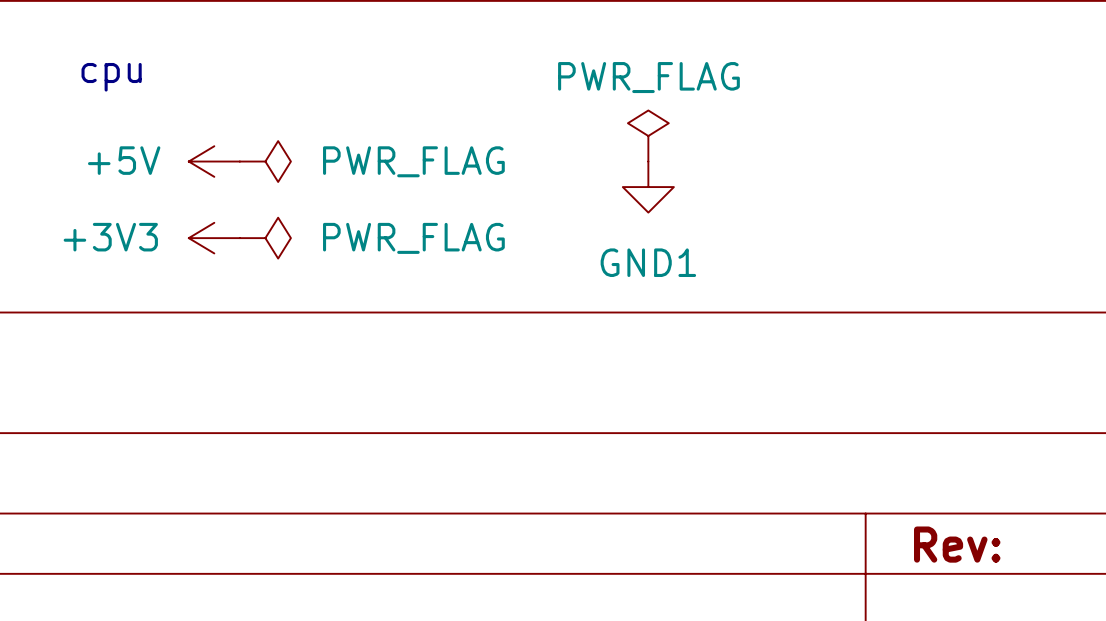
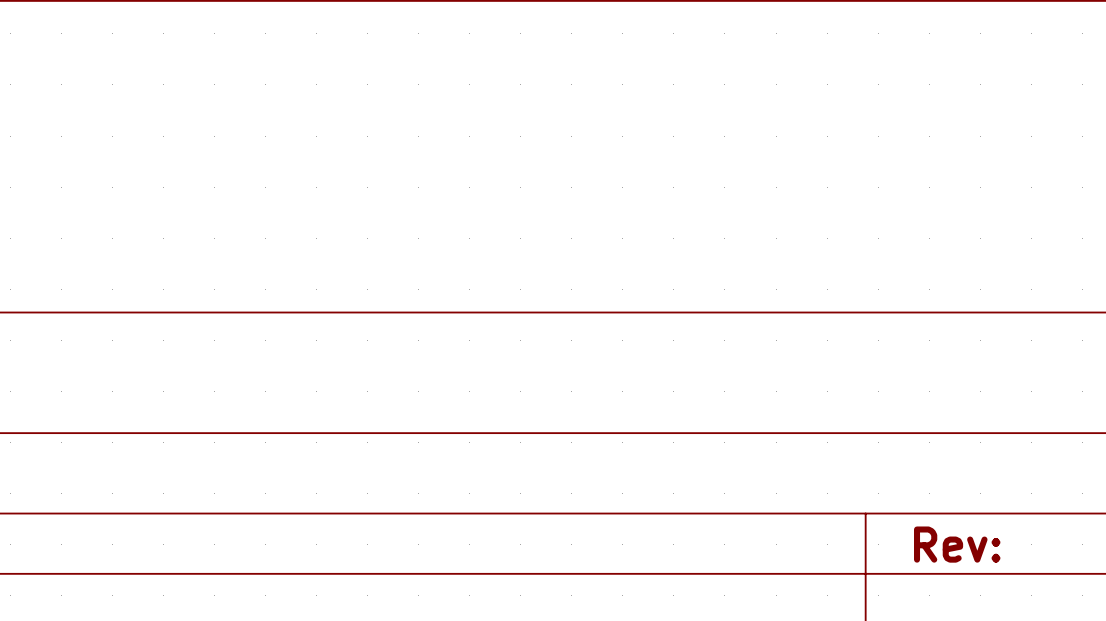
text: cpu (111, 77) -> none
power symbol: PWR_FLAG (648, 136) -> none
power symbol: +5V (214, 161) -> none
power symbol: PWR_FLAG (265, 161) -> none
power symbol: GND1 (648, 187) -> none
power symbol: +3V3 (214, 238) -> none
power symbol: PWR_FLAG (265, 238) -> none

